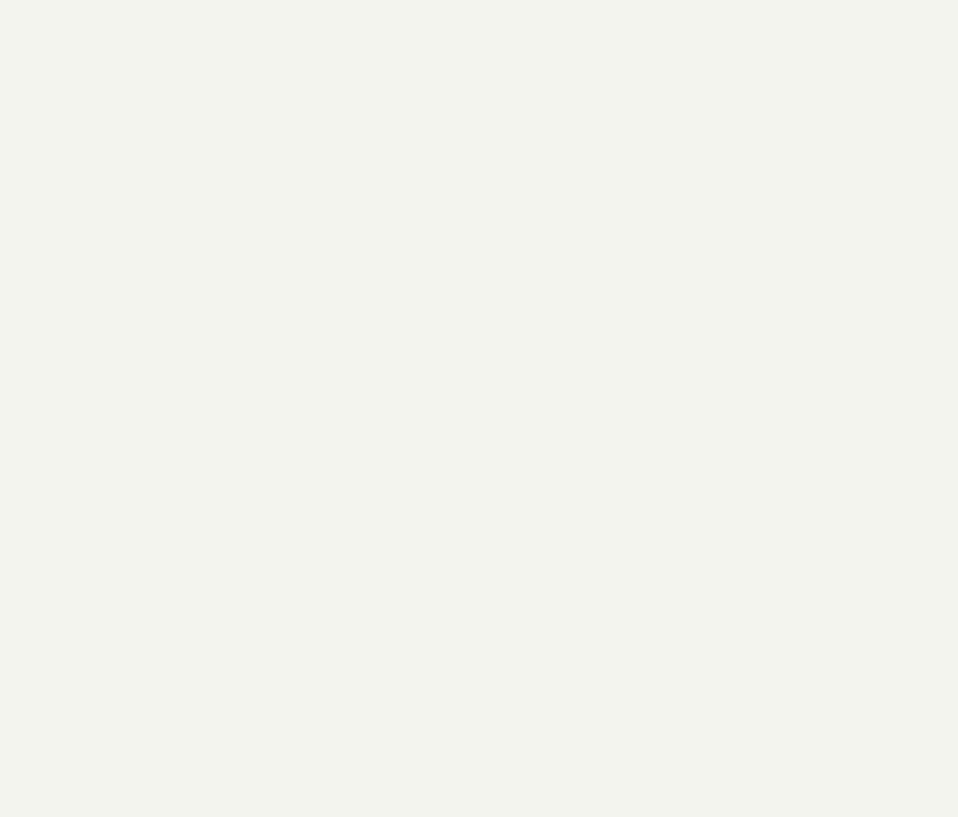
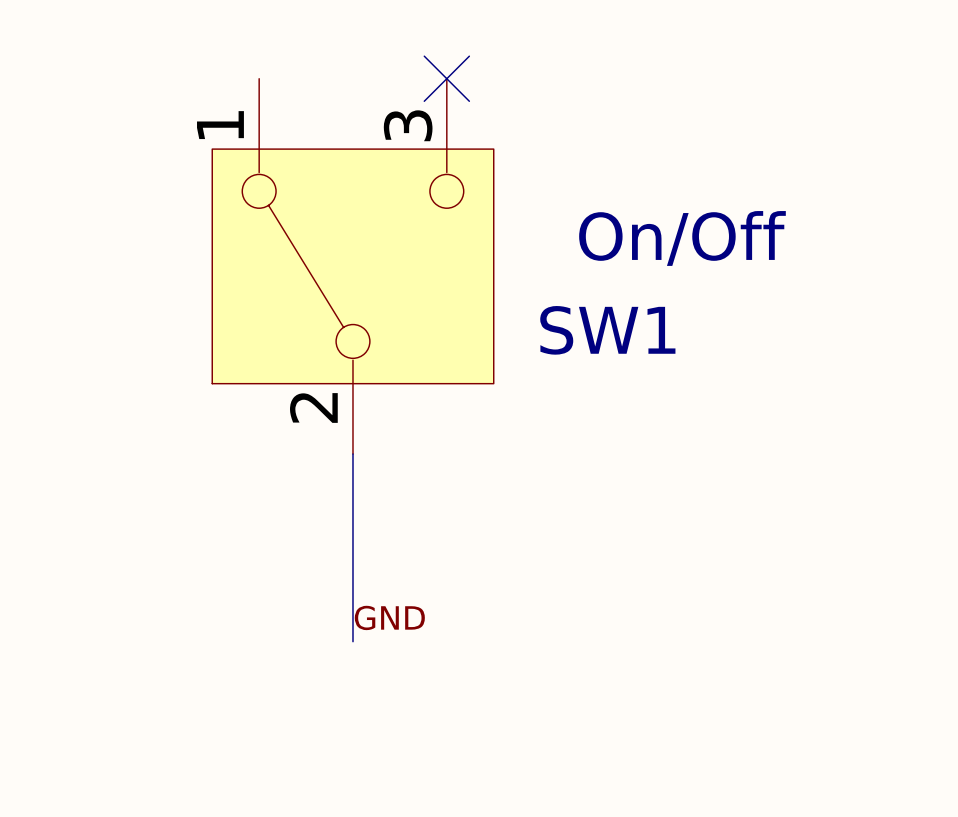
no-connect mark: none -> (446, 78)
SW1: none -> On/Off (352, 266)
wire: none -> (352, 454) (352, 641)
label: none -> GND (389, 617)

